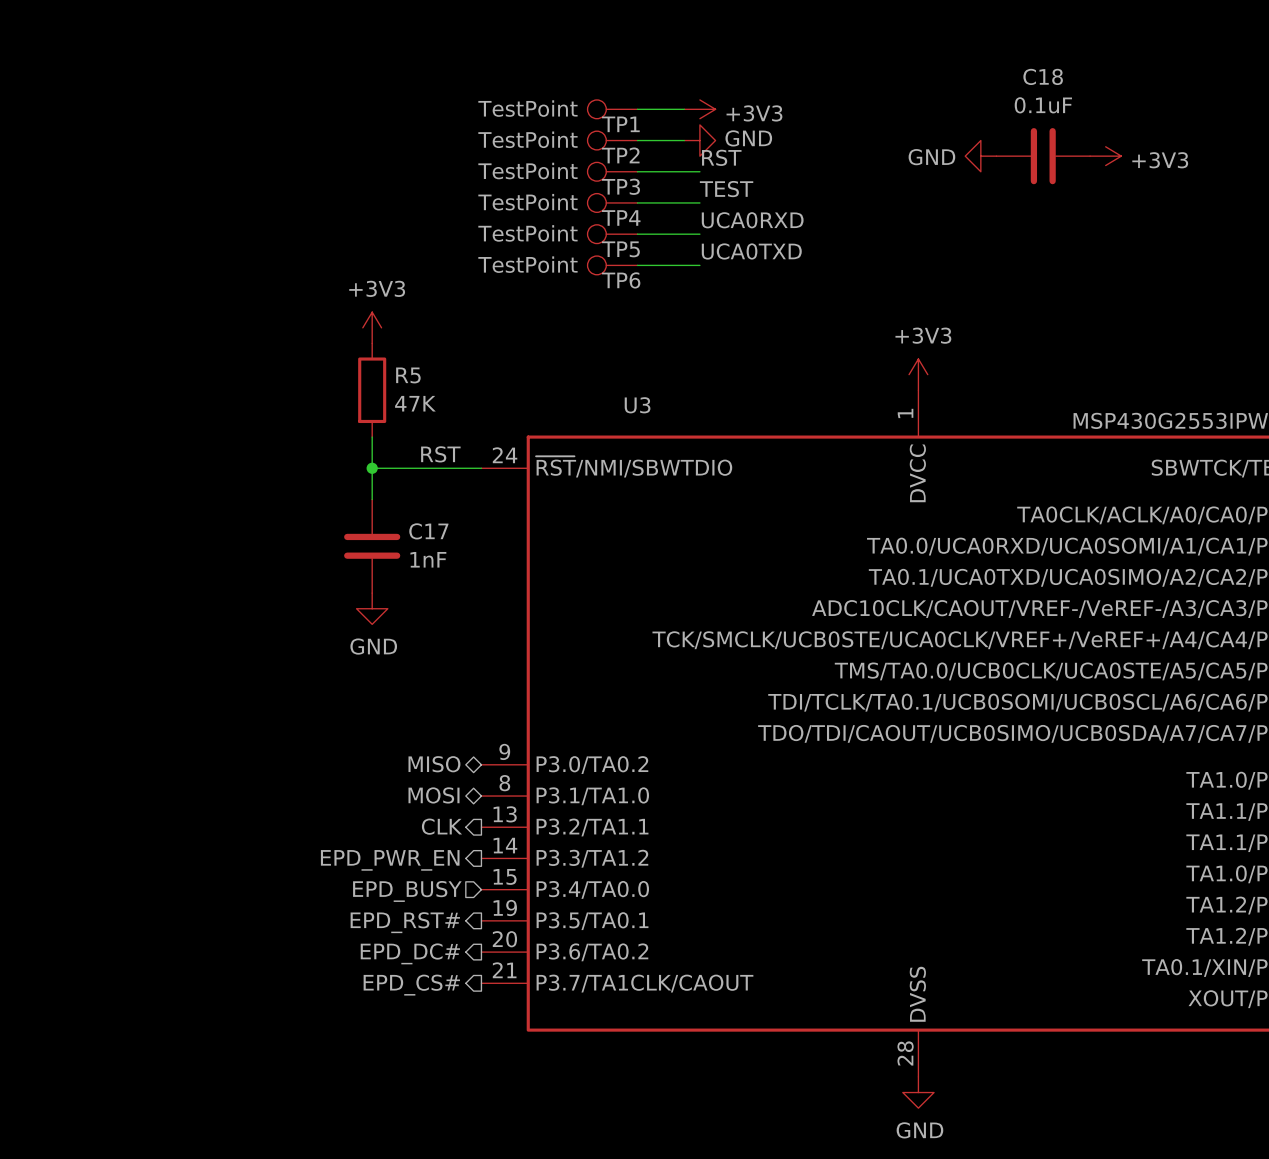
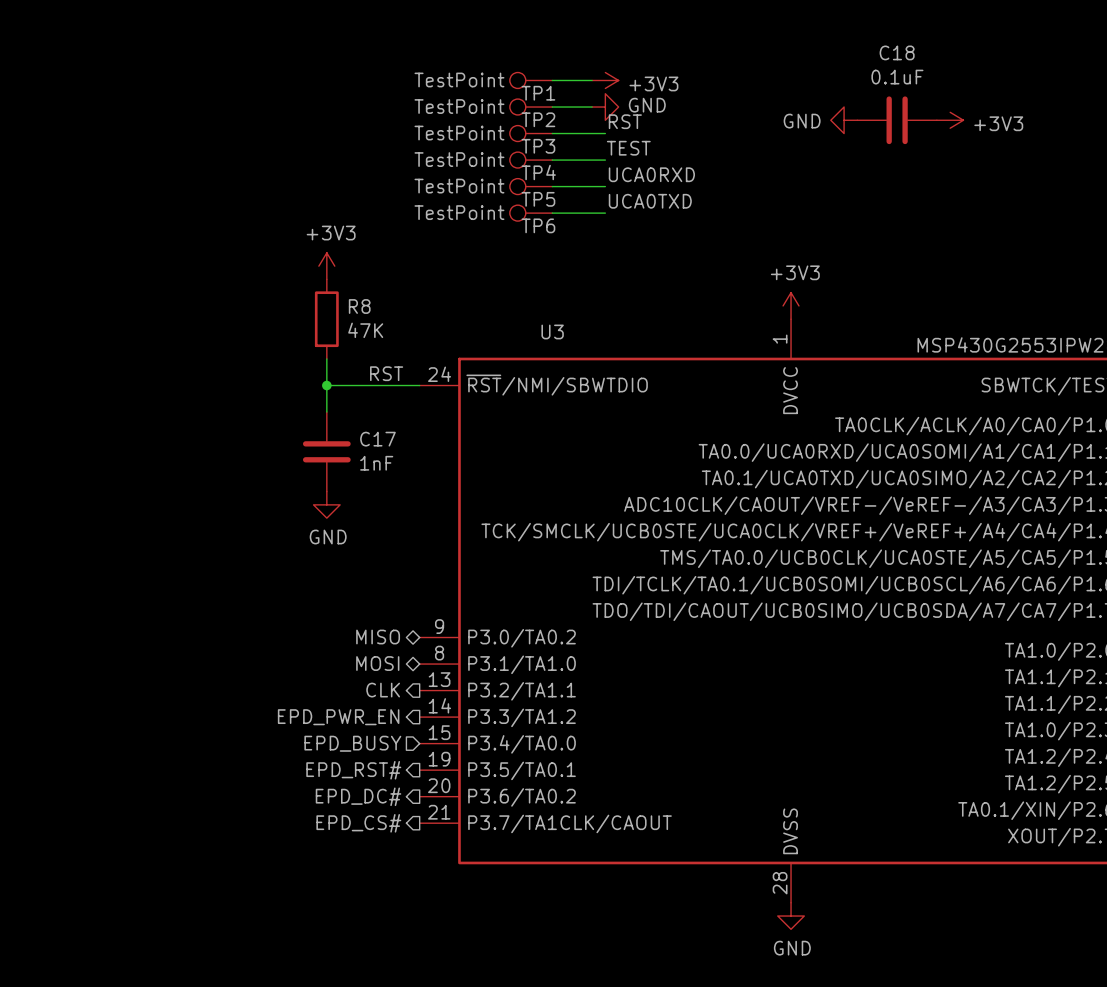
R5 name: R5 (408, 375) -> R8 (359, 306)

